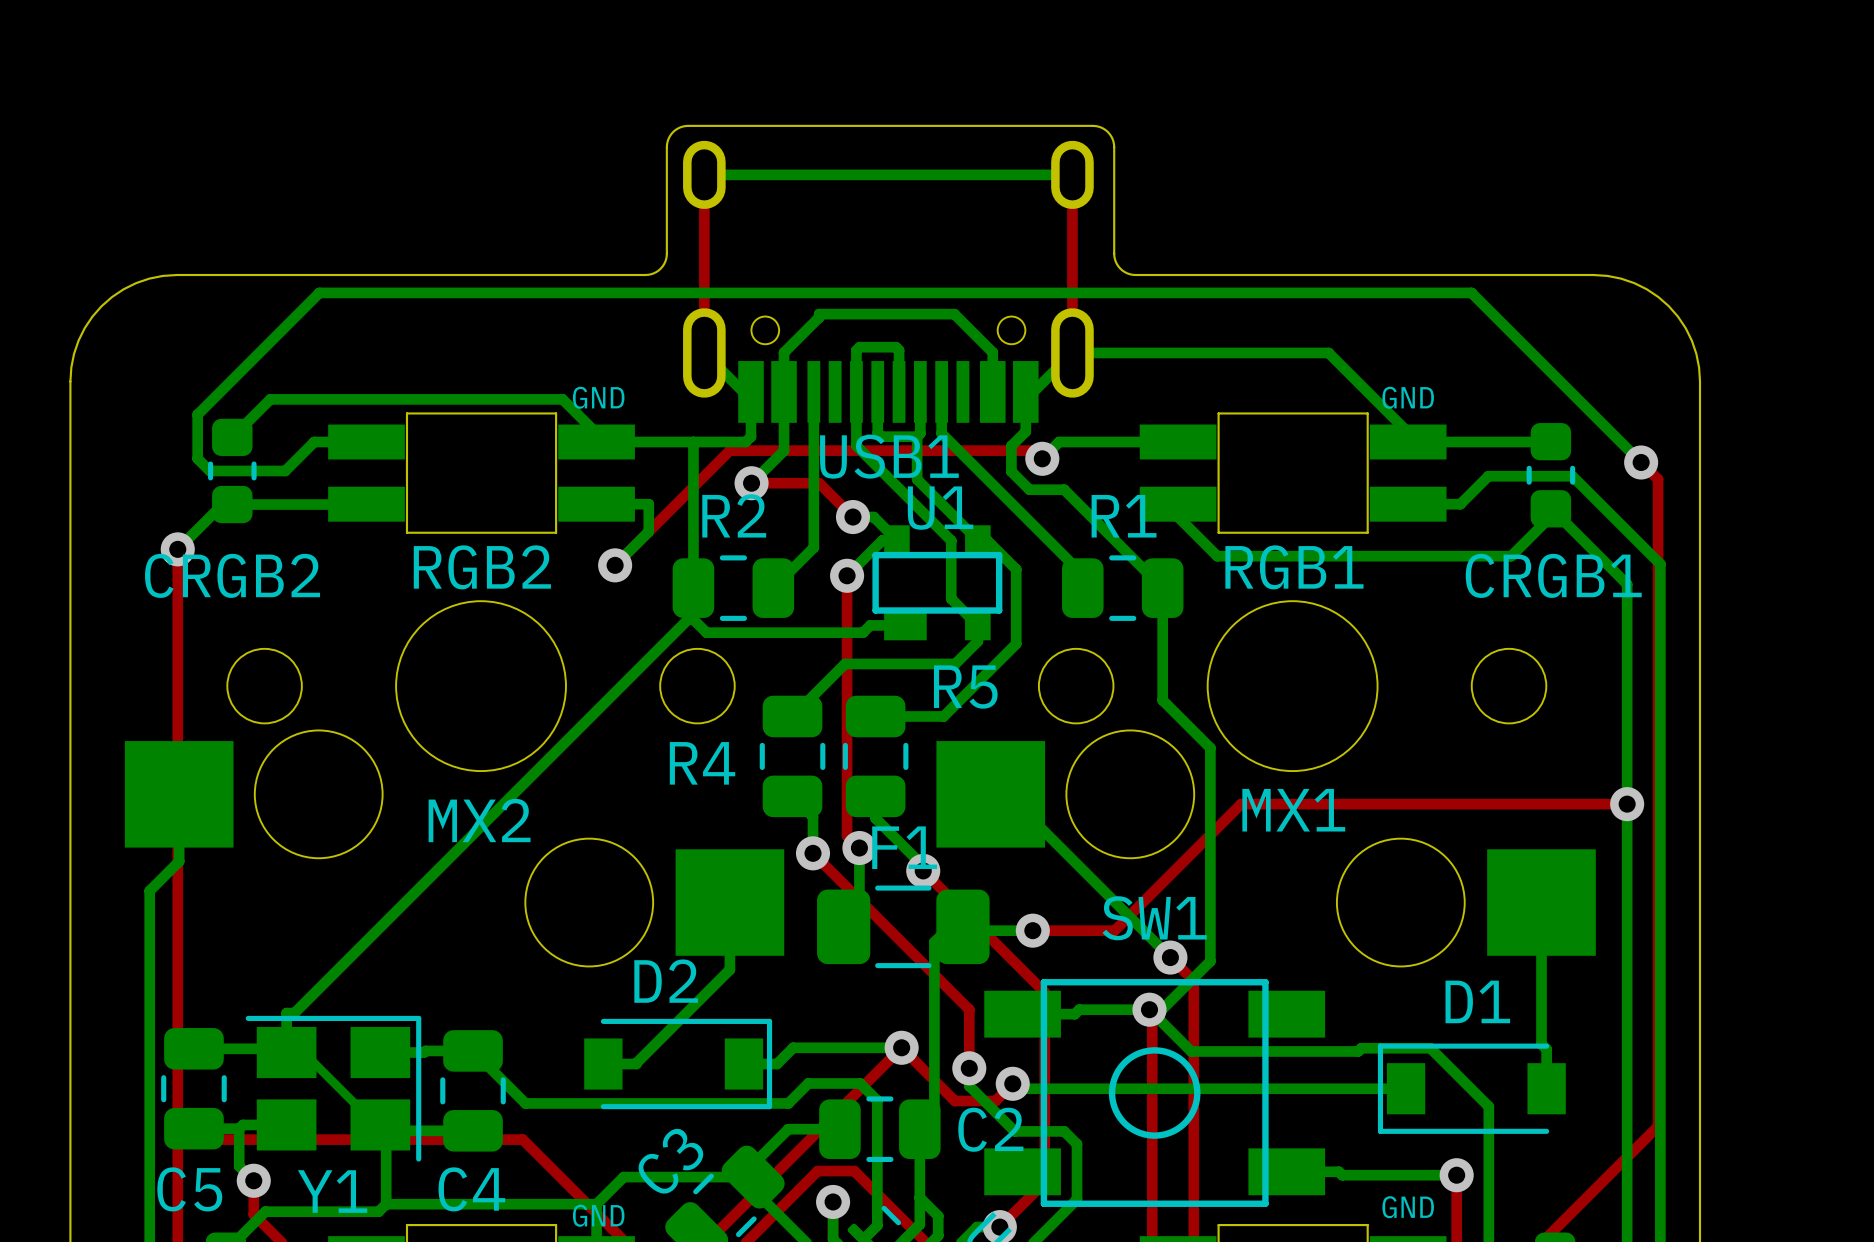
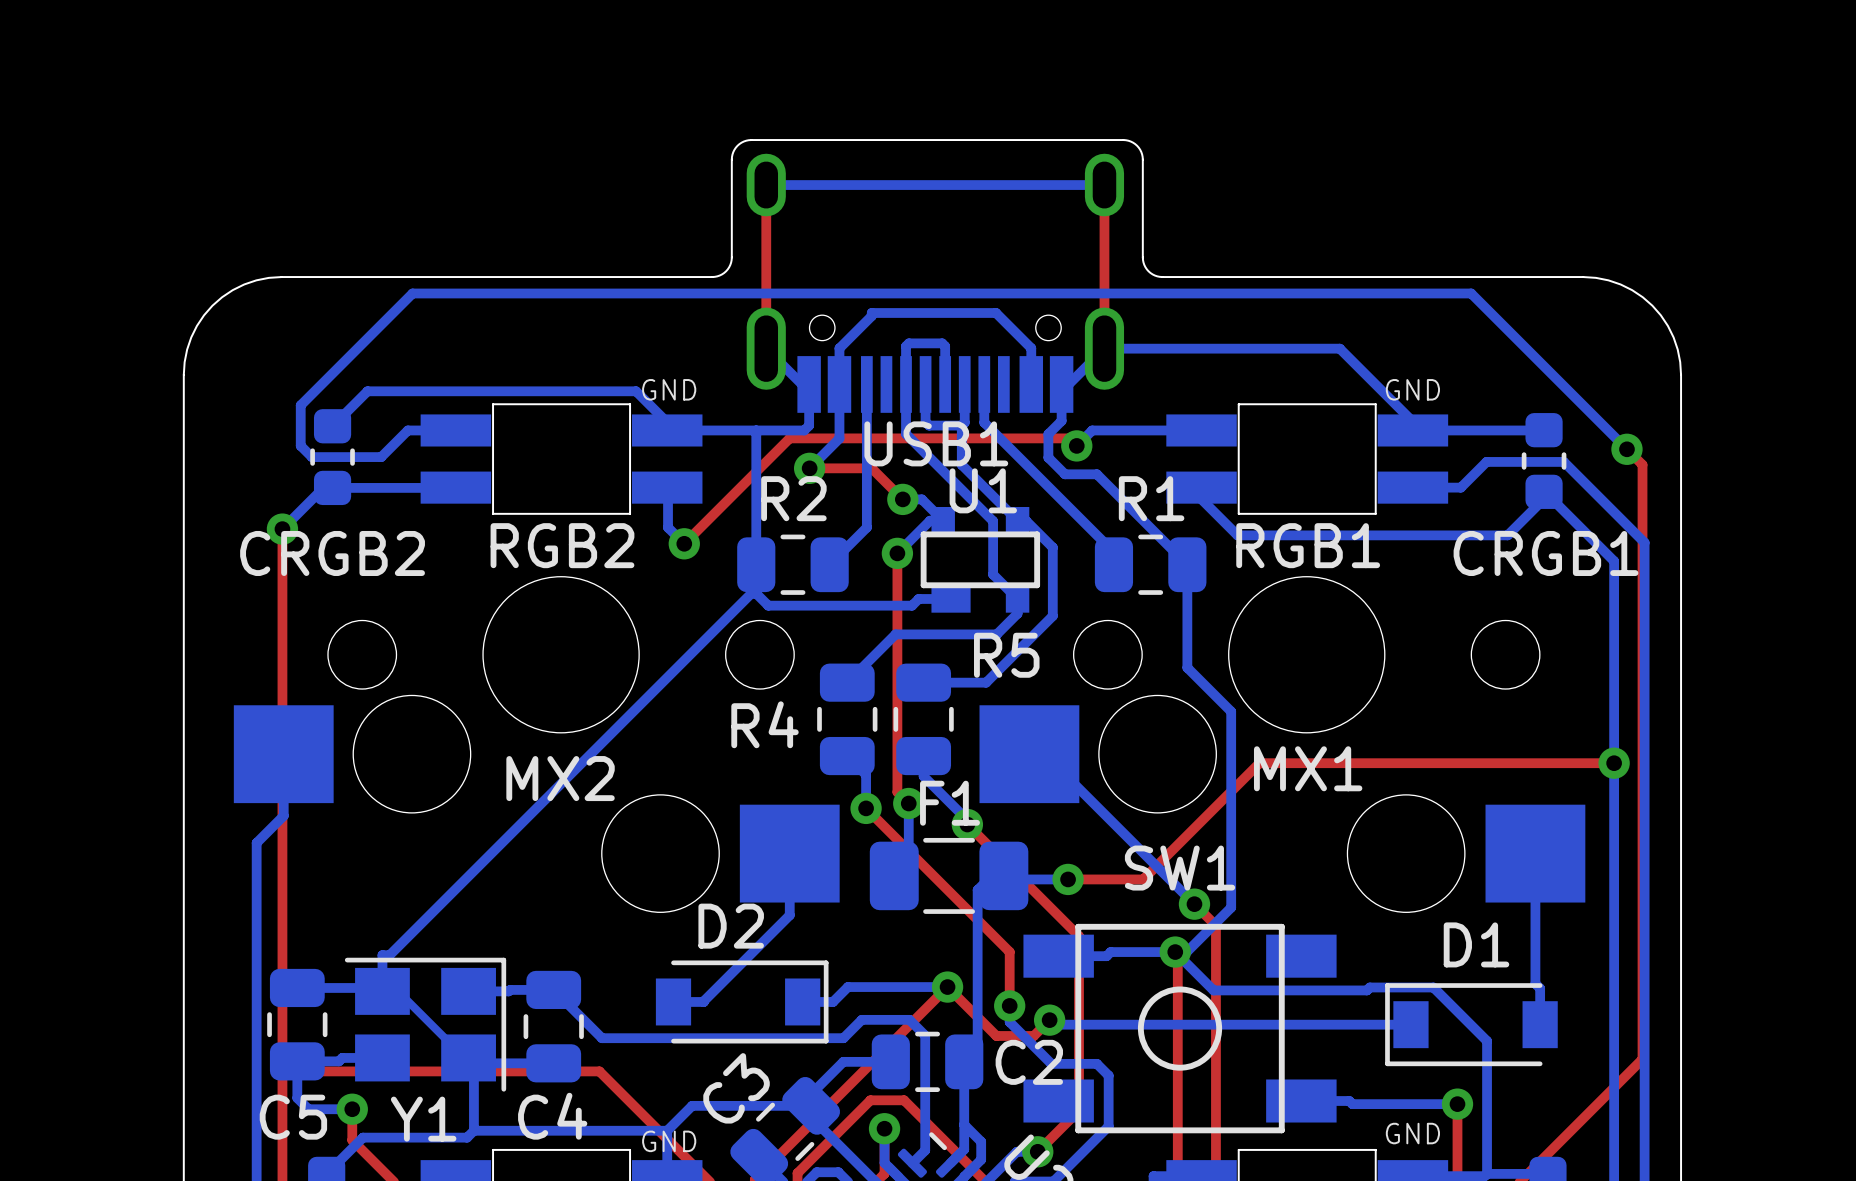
bottom track: (596, 504) (648, 504) (648, 531) (615, 565) -> (668, 487) (668, 527) (684, 543)
bottom track: (239, 1128) (239, 1166) (253, 1180) -> (297, 1061) (297, 1098) (308, 1109) (352, 1109)

